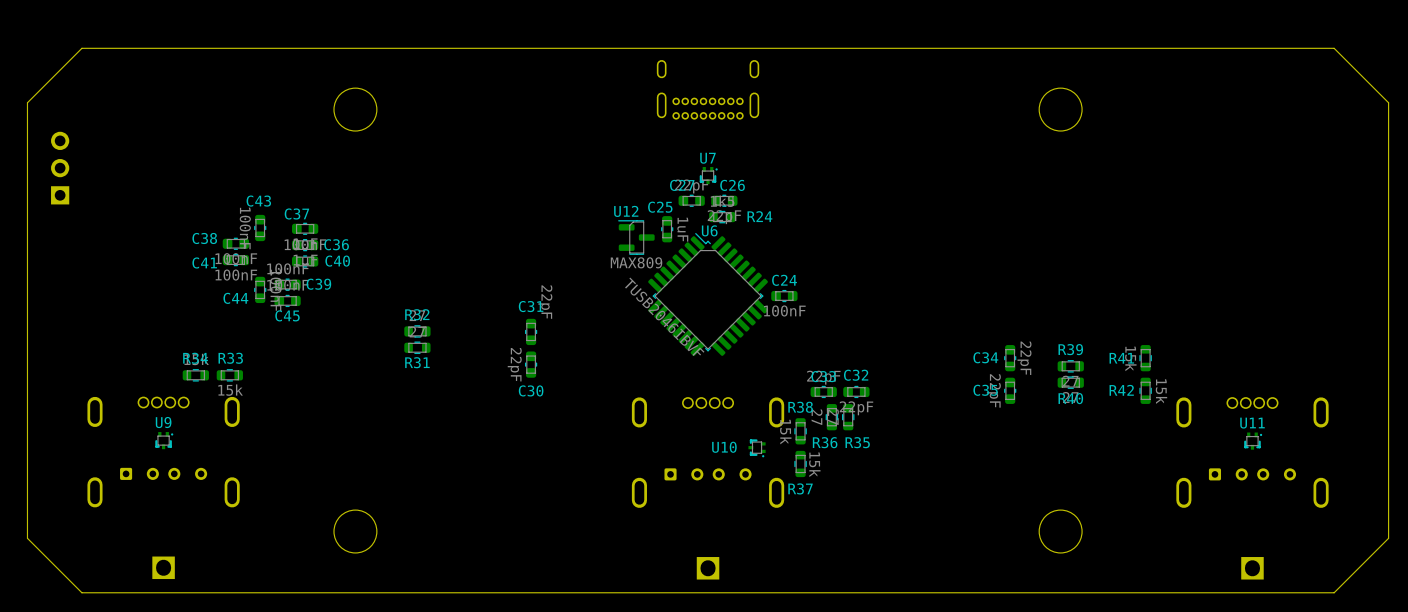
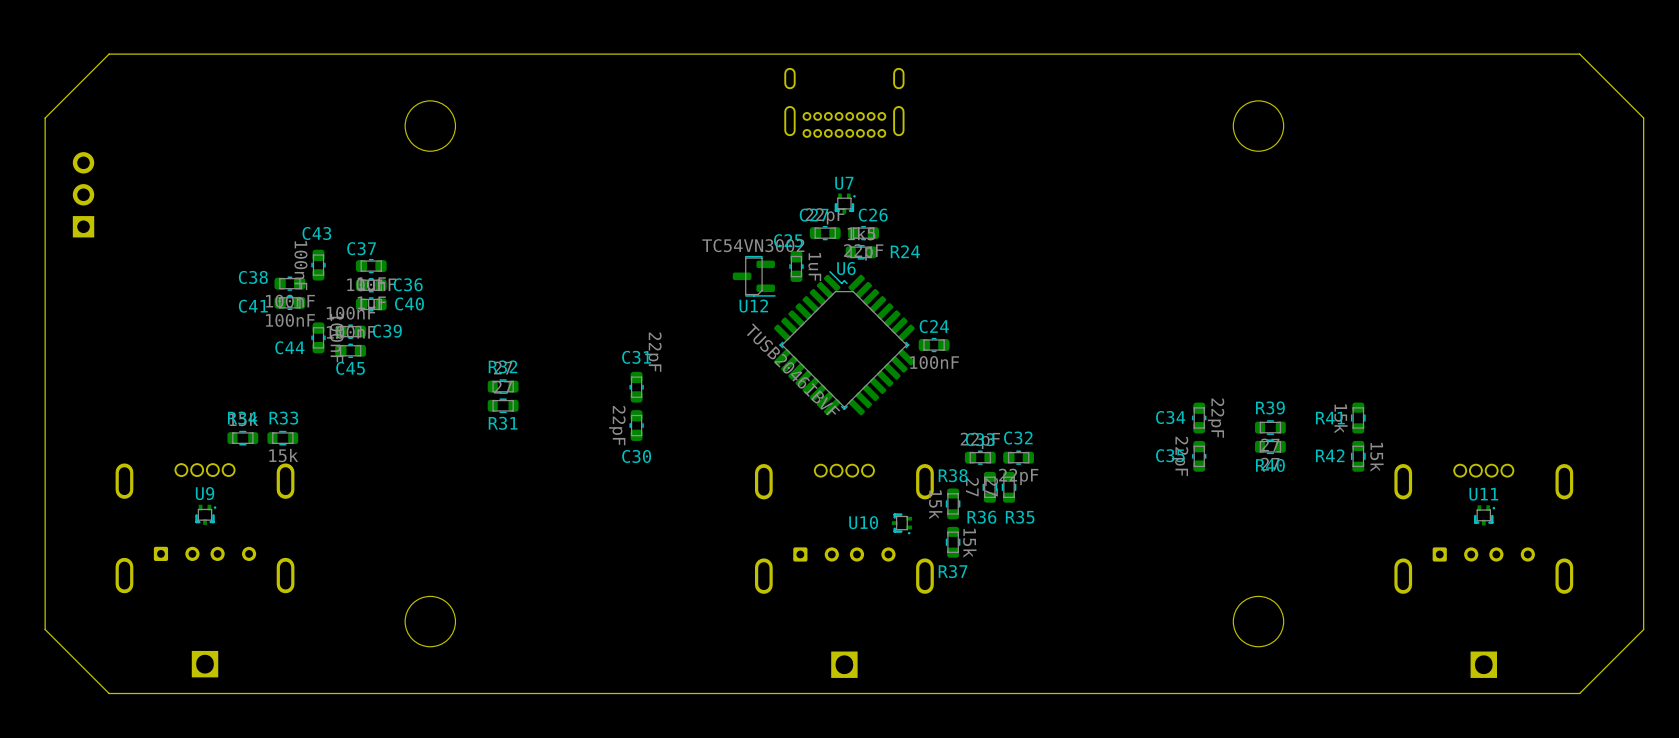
U12 rotation: 0° (636, 237) -> 180° (754, 276)
U12 value: MAX809 (636, 262) -> TC54VN3002 (753, 245)

